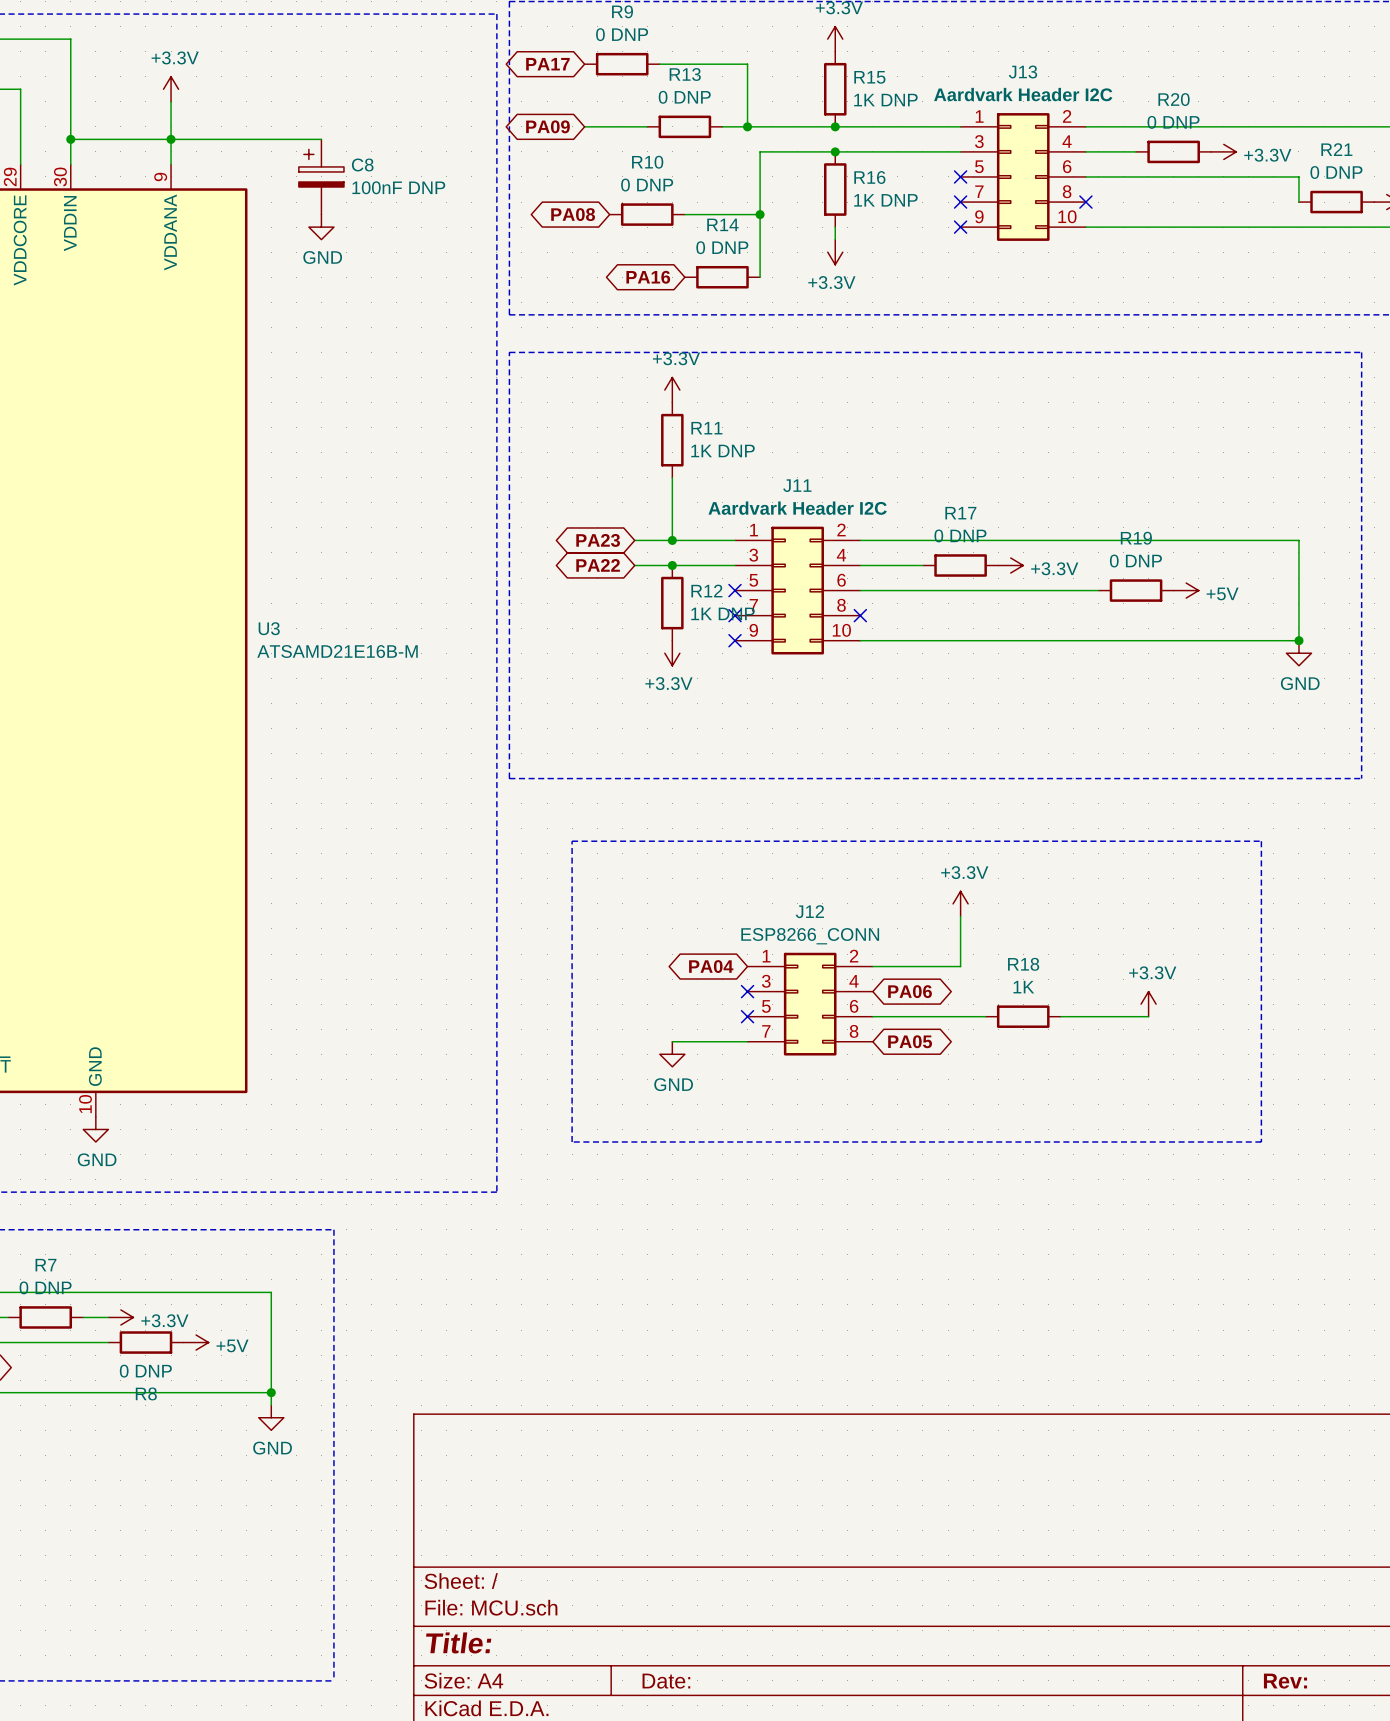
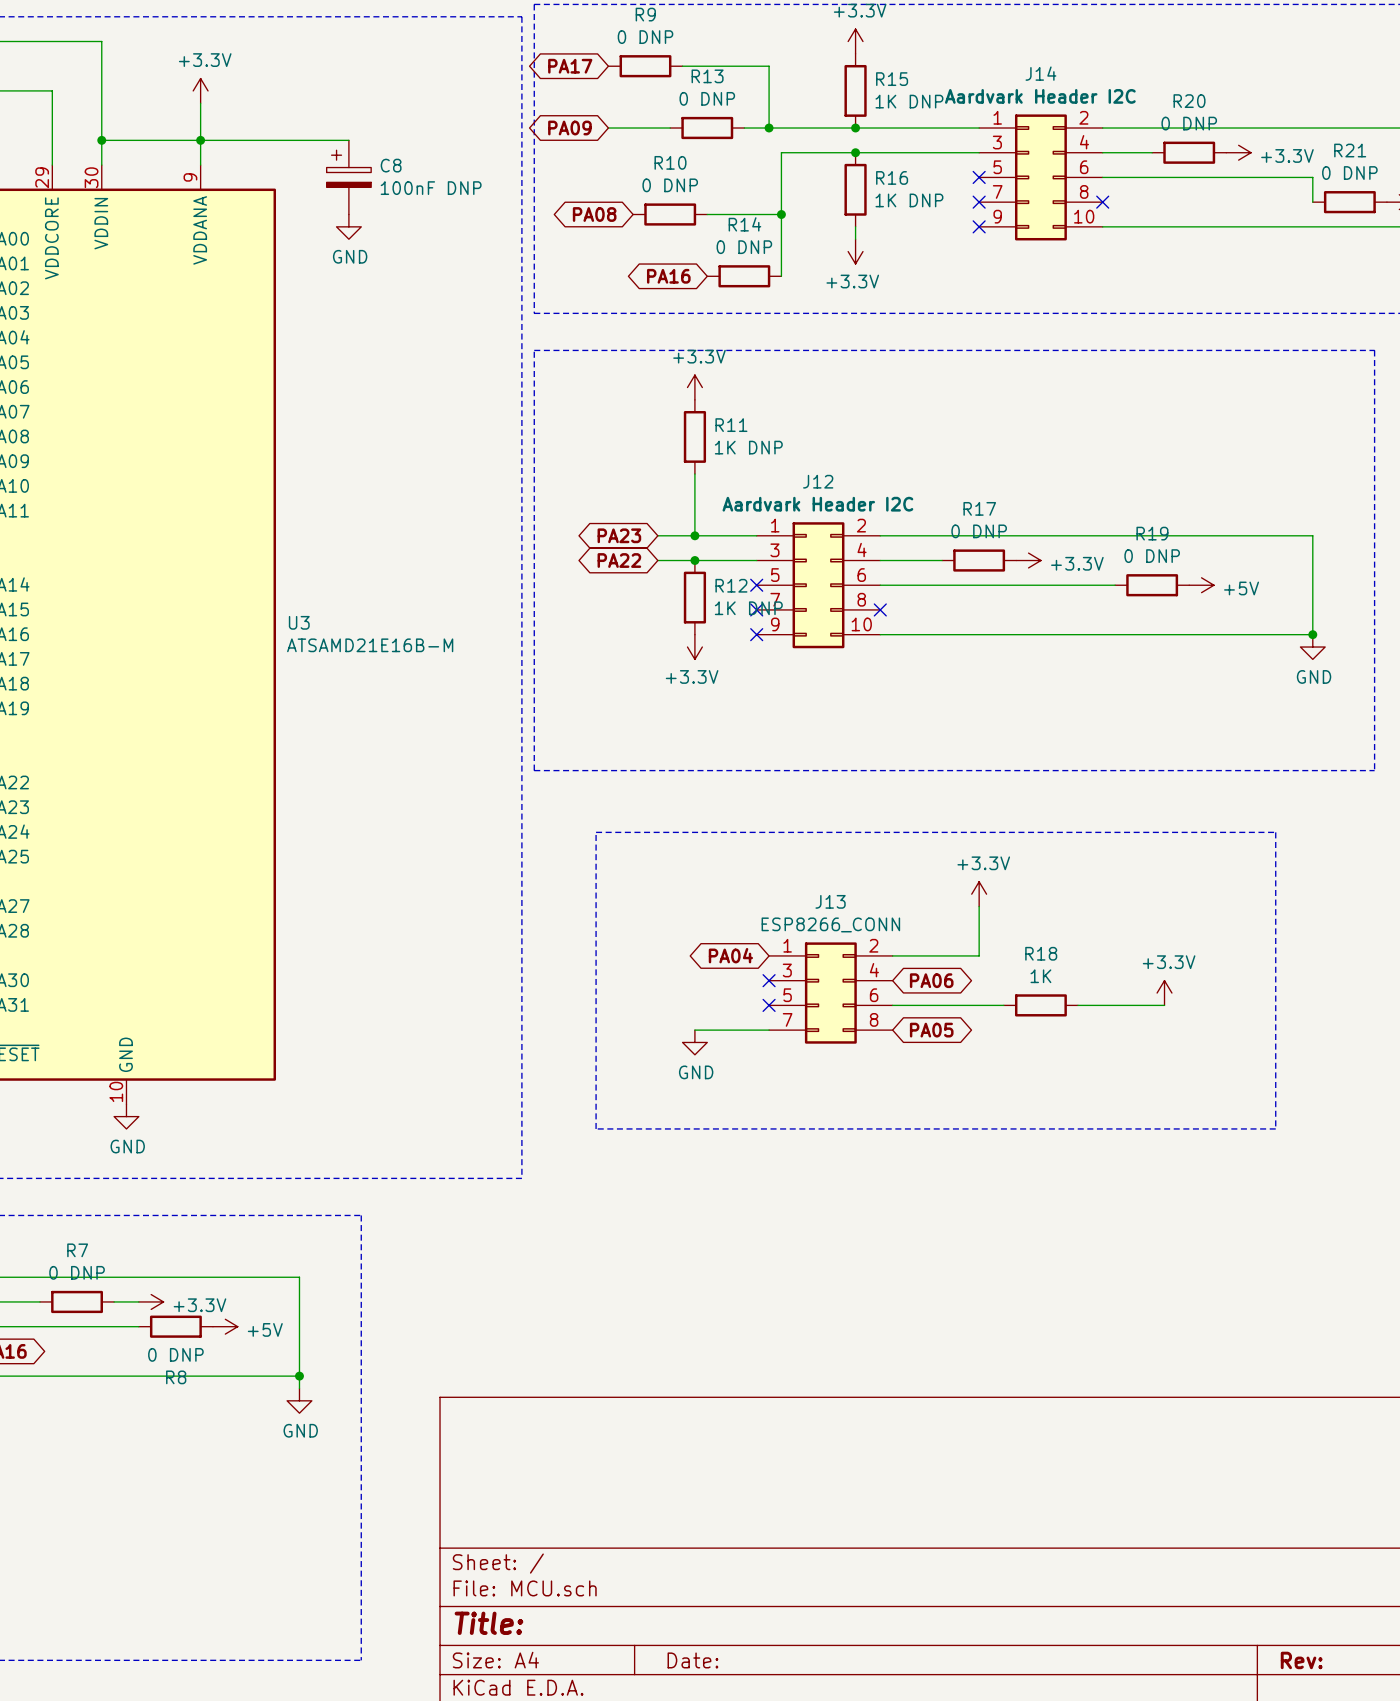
J13 name: J13 (1023, 71) -> J14 (1040, 73)
J11 name: J11 (797, 485) -> J12 (818, 481)
J12 name: J12 (809, 911) -> J13 (830, 901)

